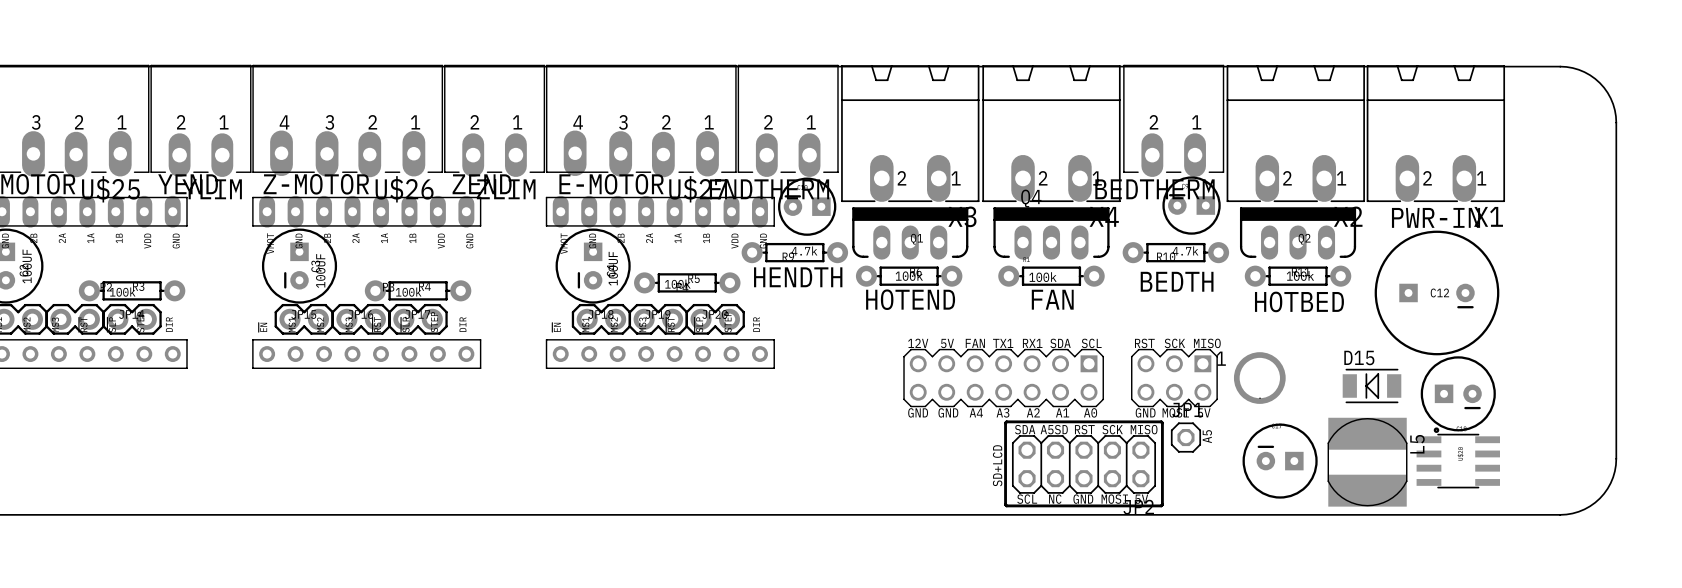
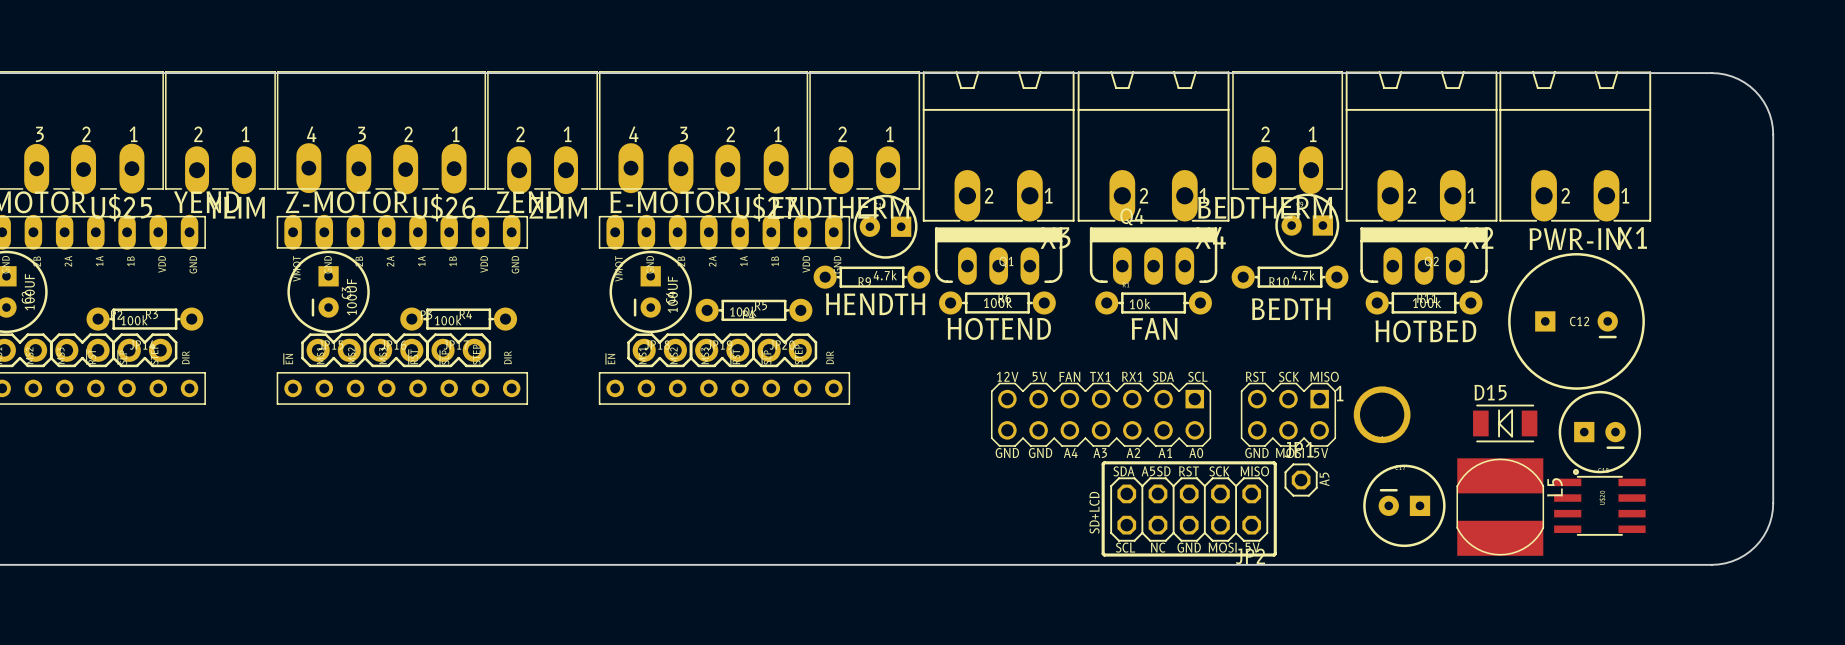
part value: 100k (1042, 277) -> 10k (1140, 303)

